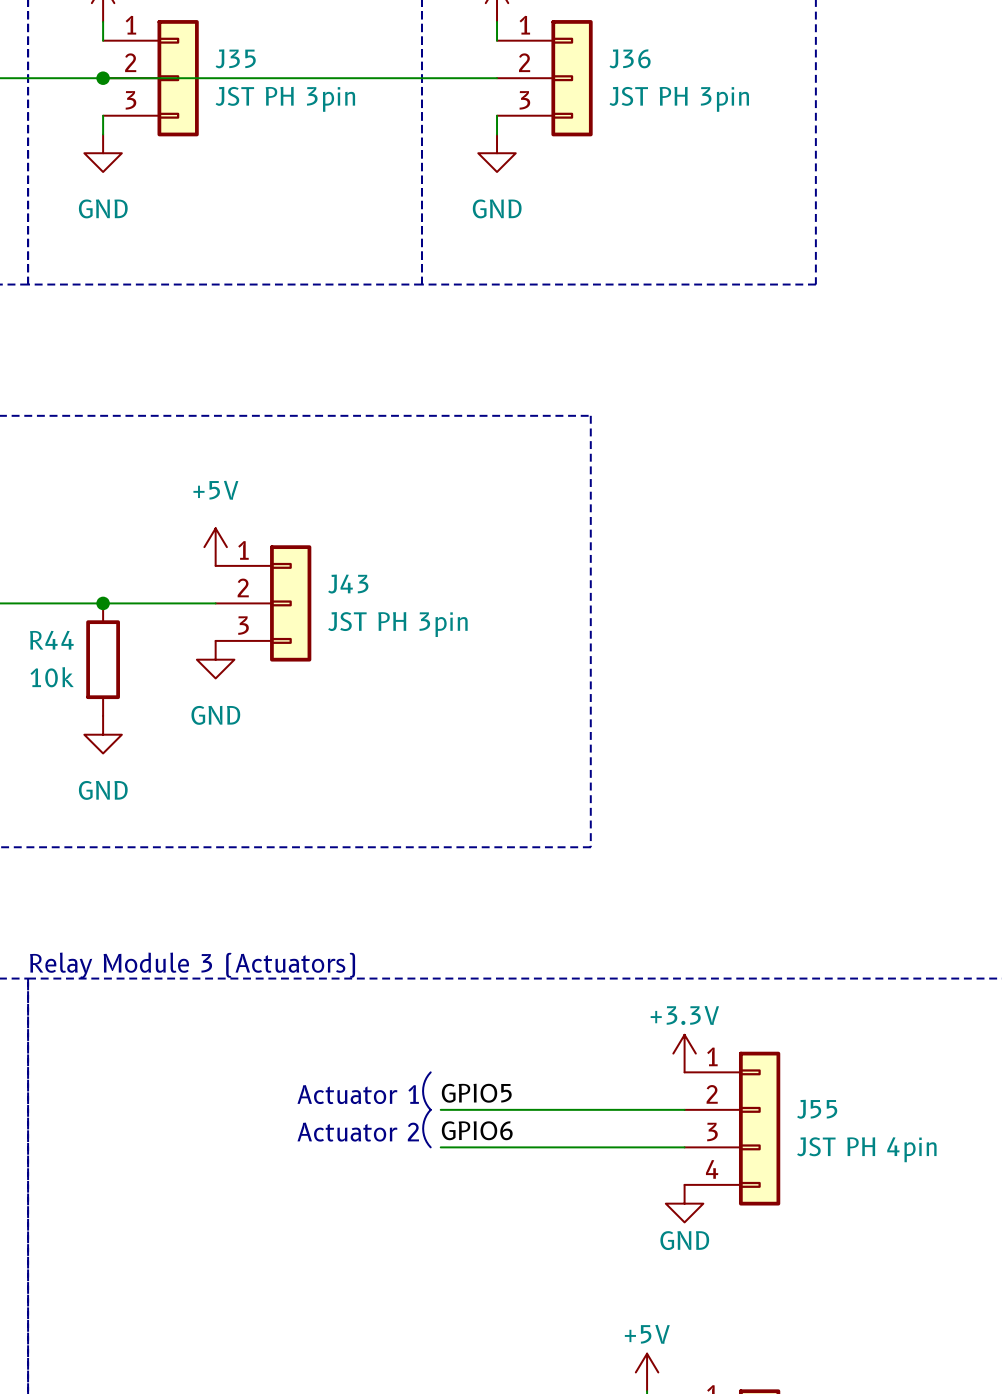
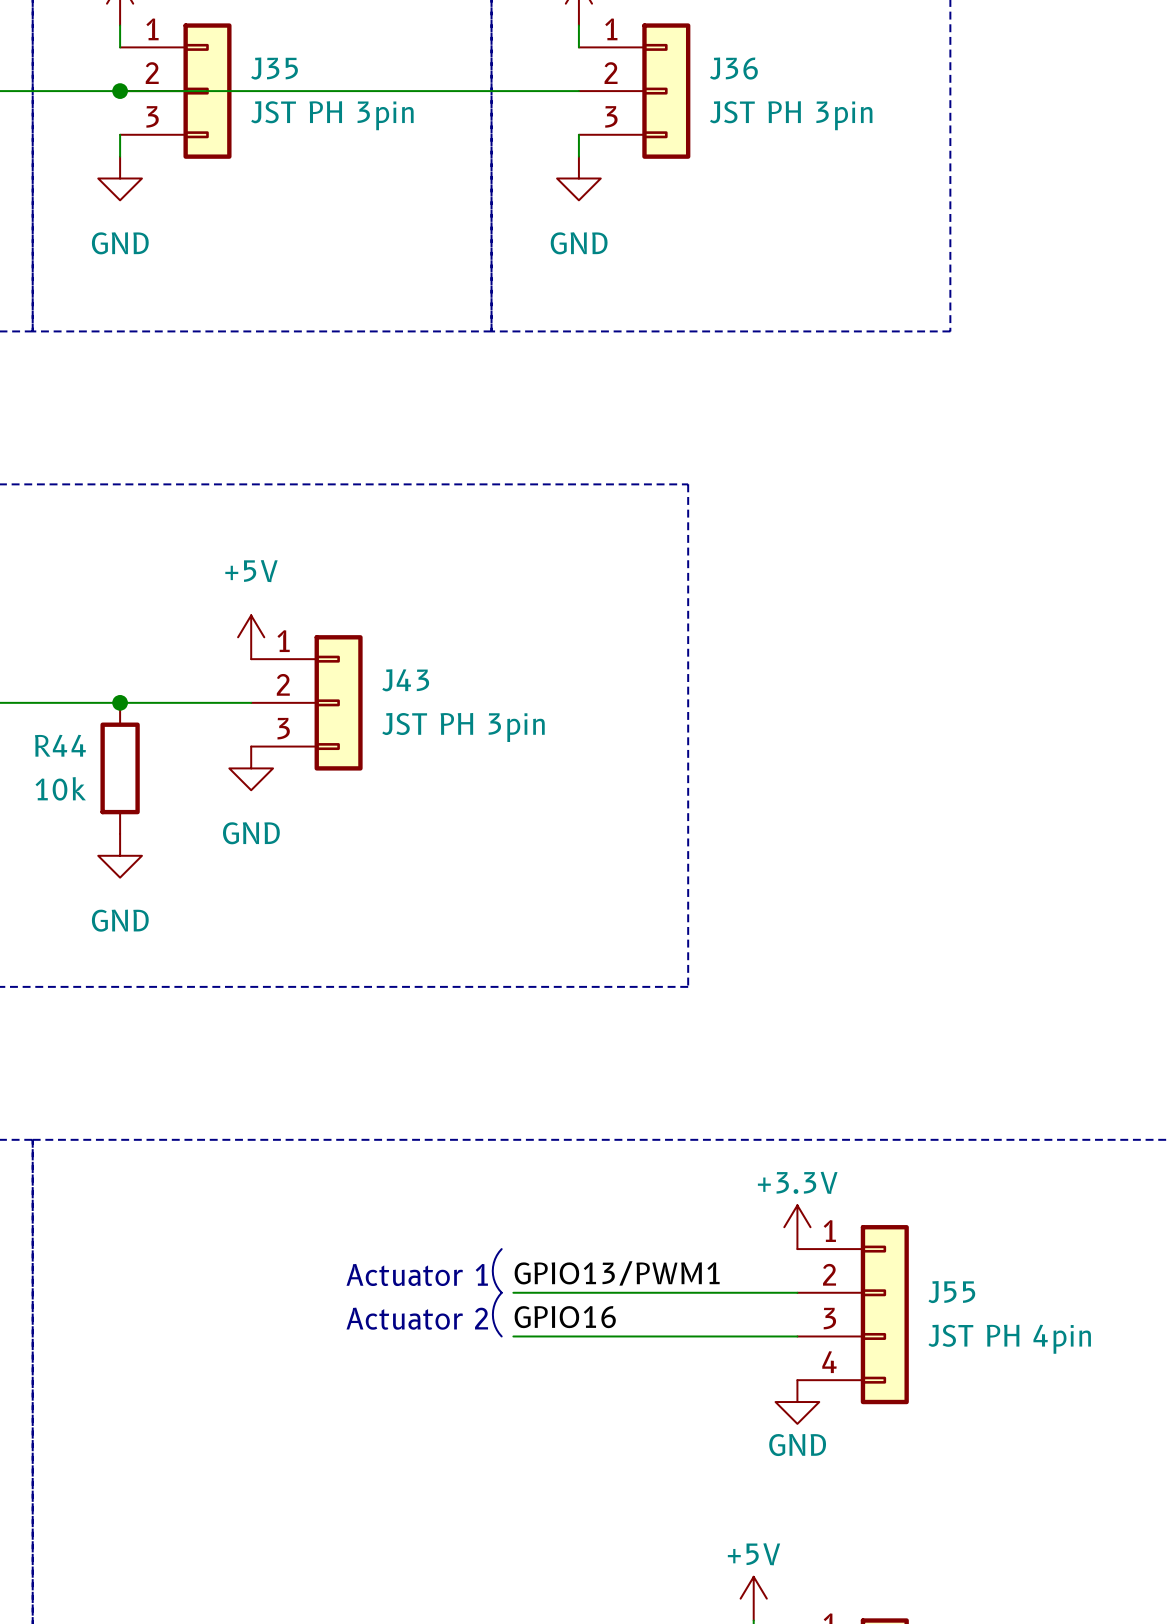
text: Relay Module 3 (Actuators) (192, 965) -> none
label: GPIO5 (476, 1093) -> GPIO13/PWM1 (617, 1273)
label: GPIO6 (477, 1130) -> GPIO16 (565, 1317)

